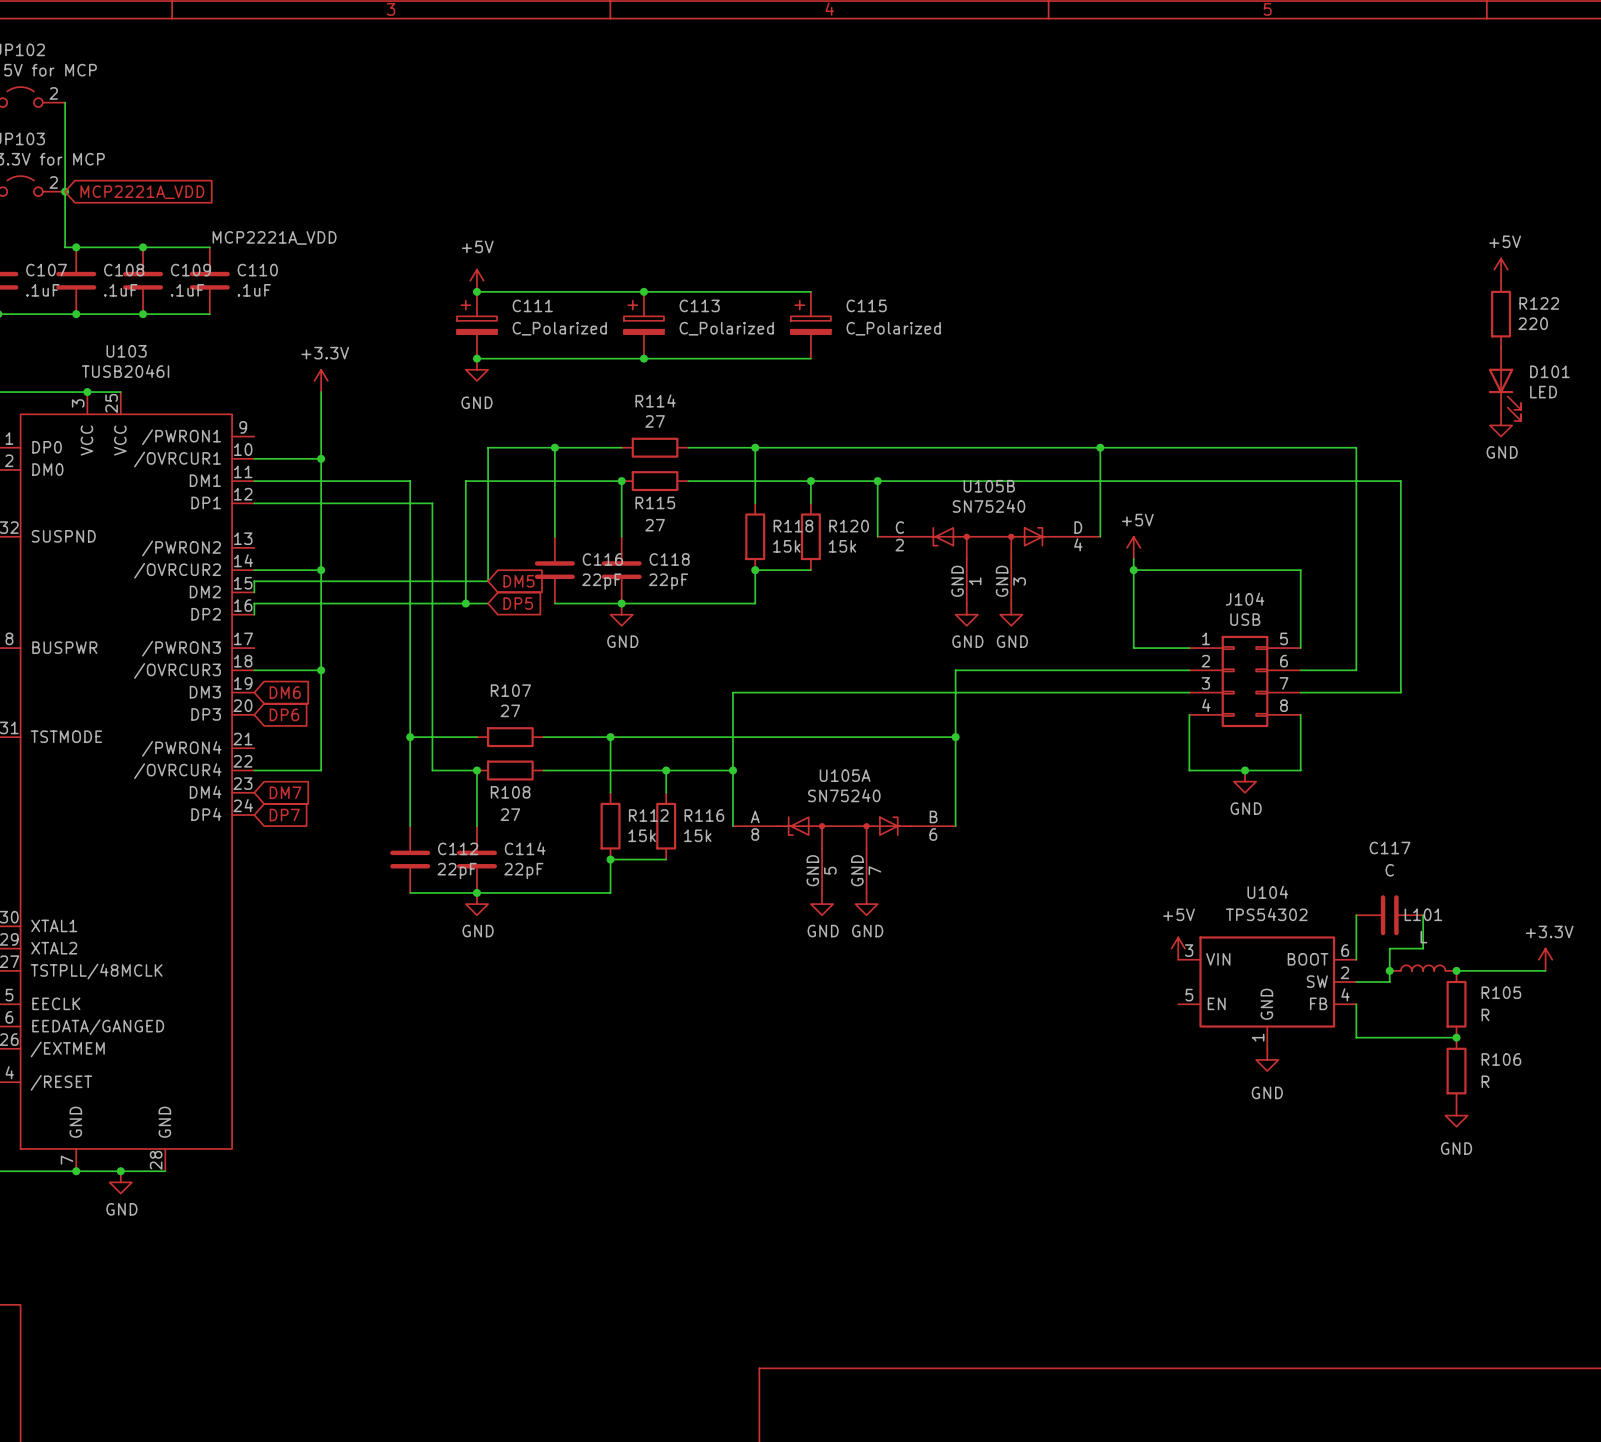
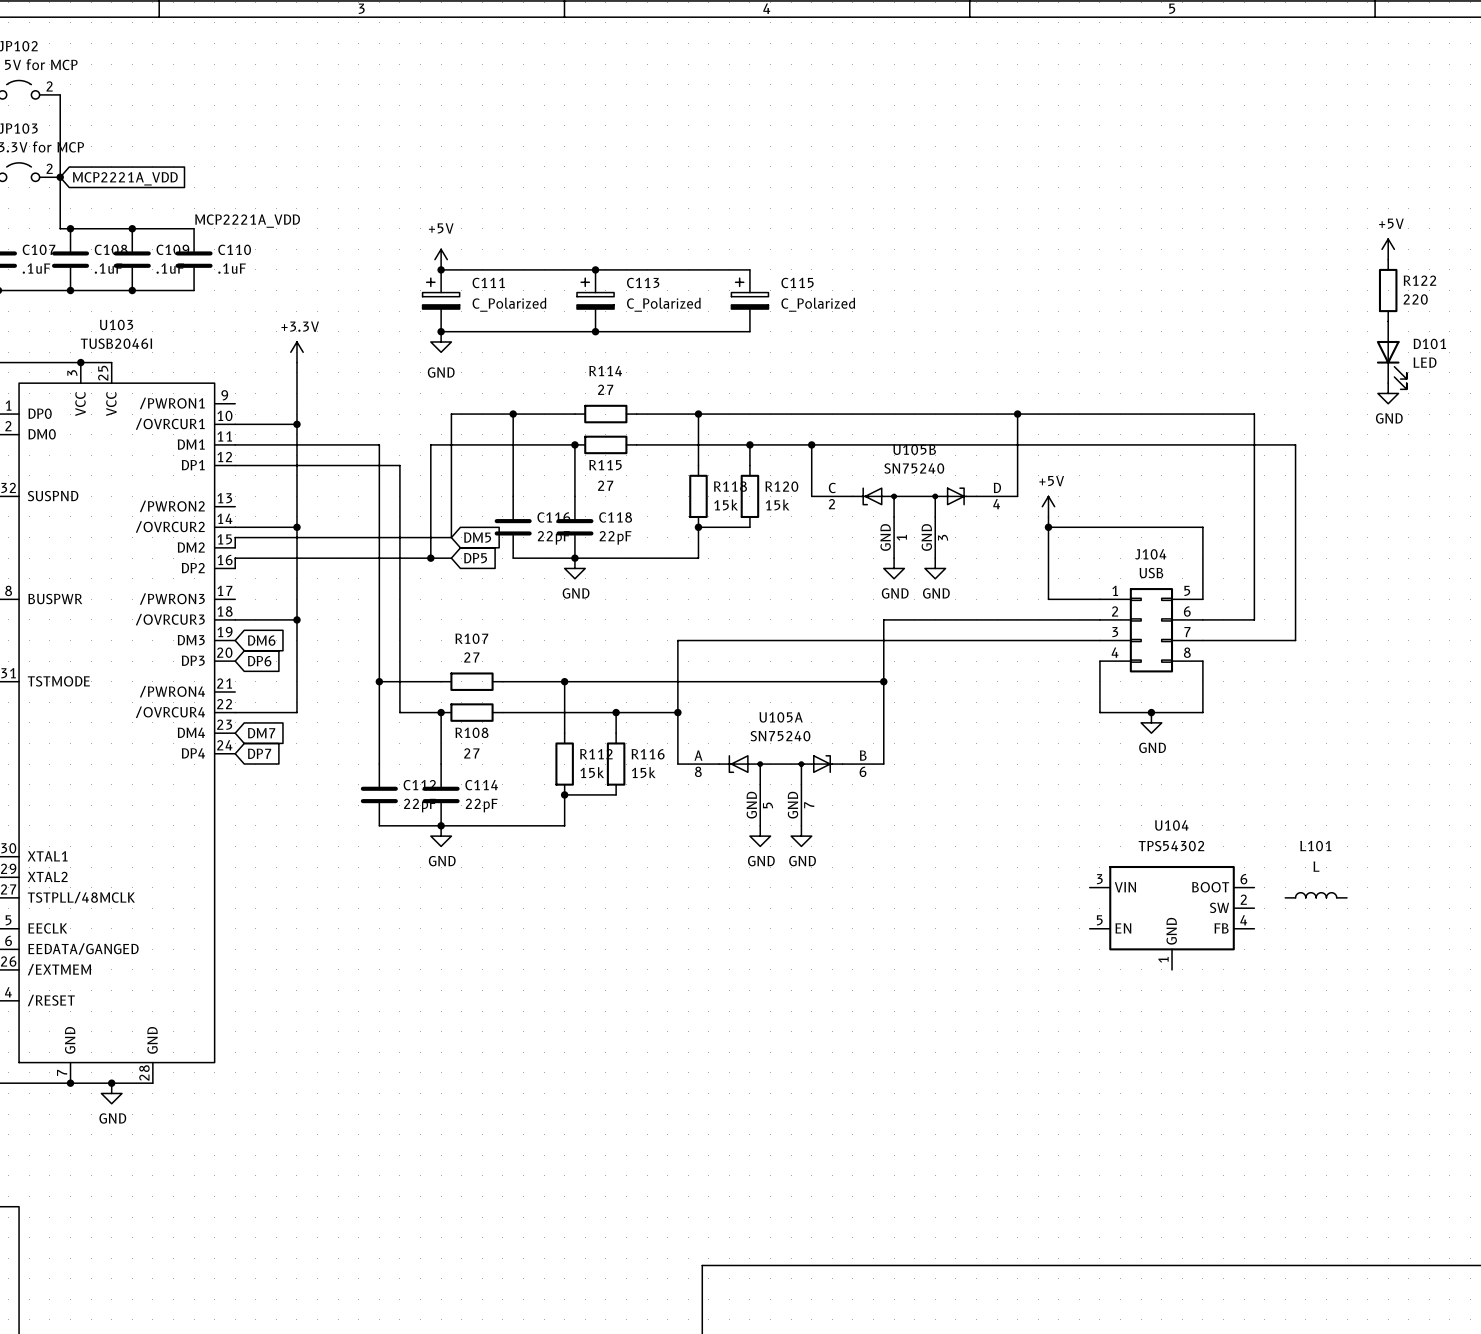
wire: (1356, 915) (1356, 959) -> none
C117: C (1389, 915) -> none
wire: (1423, 915) (1423, 948) (1389, 948) (1389, 982) (1356, 982) -> none
power symbol: +5V (1178, 948) -> none
power symbol: +3.3V (1545, 959) -> none
junction: (1389, 970) -> none
wire: (1456, 970) (1545, 970) -> none
junction: (1456, 970) -> none
wire: (1356, 1004) (1356, 1037) (1456, 1037) -> none
R105: R (1456, 1004) -> none
junction: (1456, 1037) -> none
power symbol: GND (1267, 1059) -> none
R106: R (1456, 1071) -> none
power symbol: GND (1456, 1115) -> none

